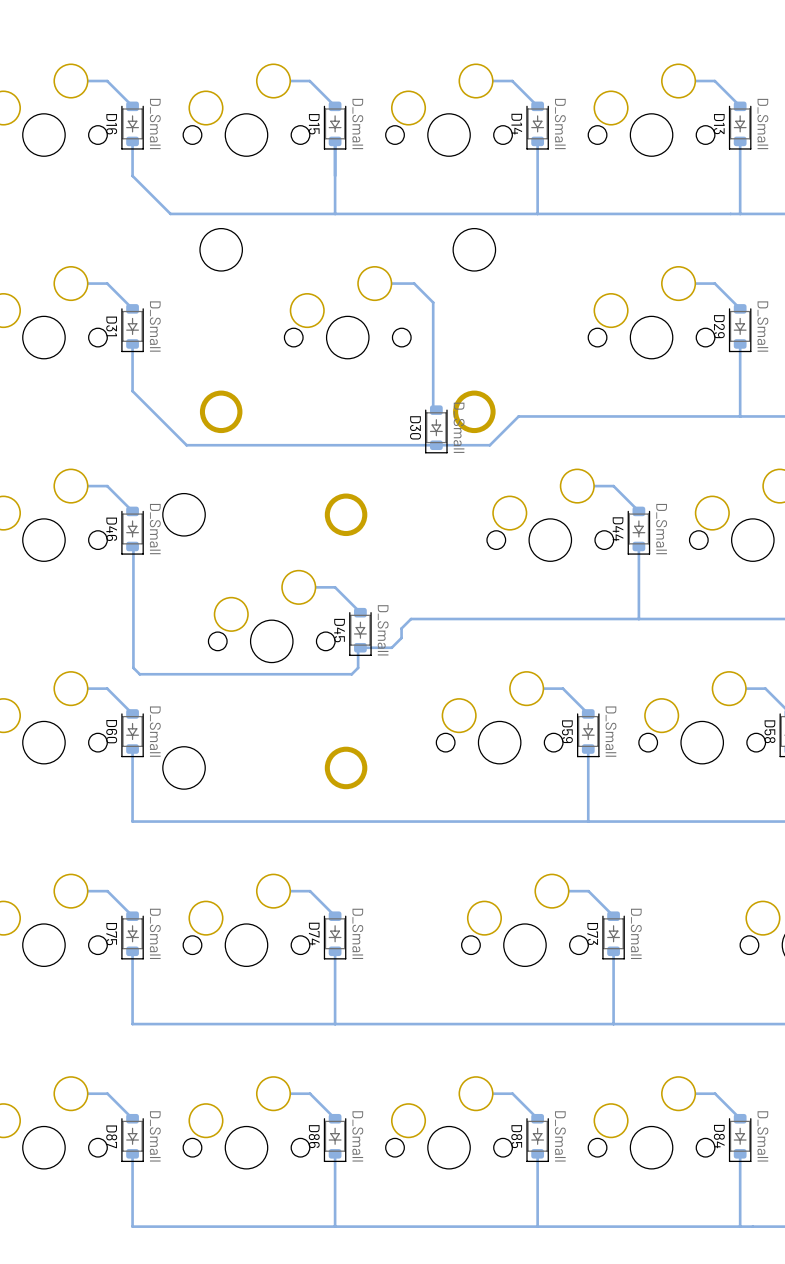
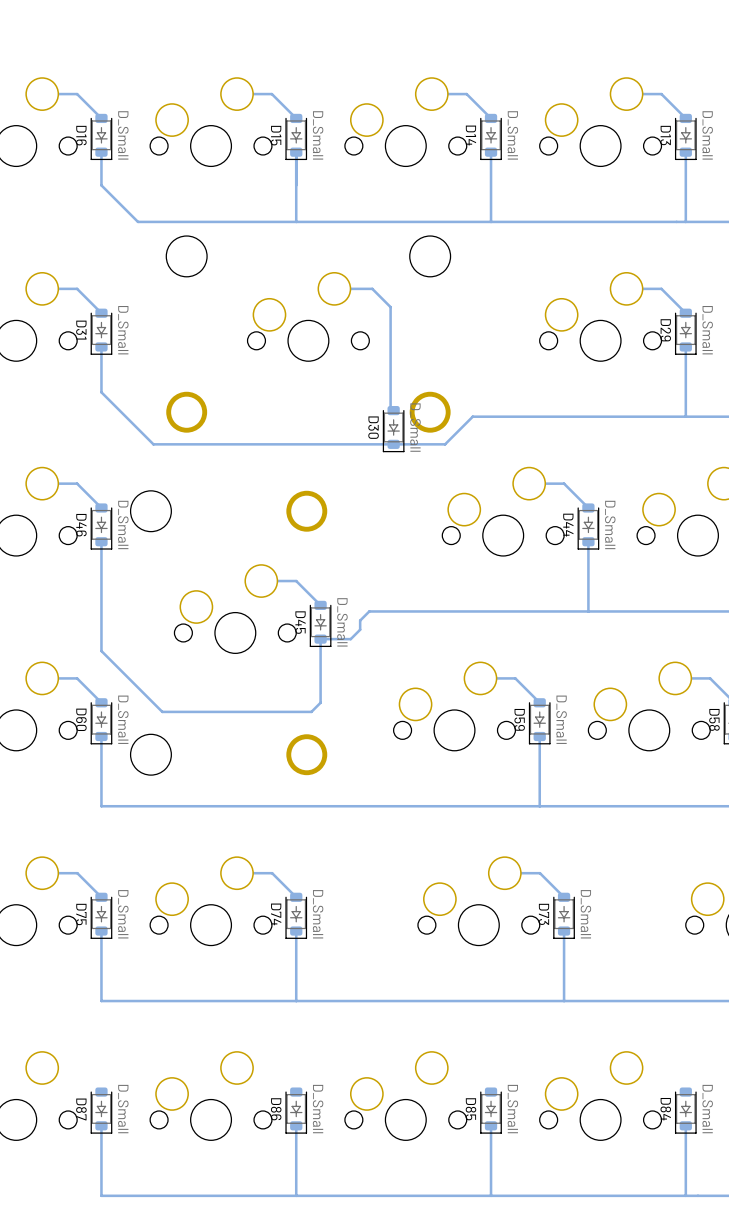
track: (132, 546) (133, 667) (139, 674) (351, 674) (358, 667) (358, 650) (360, 647) -> (101, 541) (101, 651) (162, 711) (311, 711) (320, 702) (320, 639)
track: (70, 1093) (107, 1093) (132, 1118) -> none
track: (273, 1093) (310, 1093) (335, 1118) -> none
track: (476, 1093) (512, 1093) (537, 1118) -> none
track: (678, 1093) (715, 1093) (740, 1118) -> none

